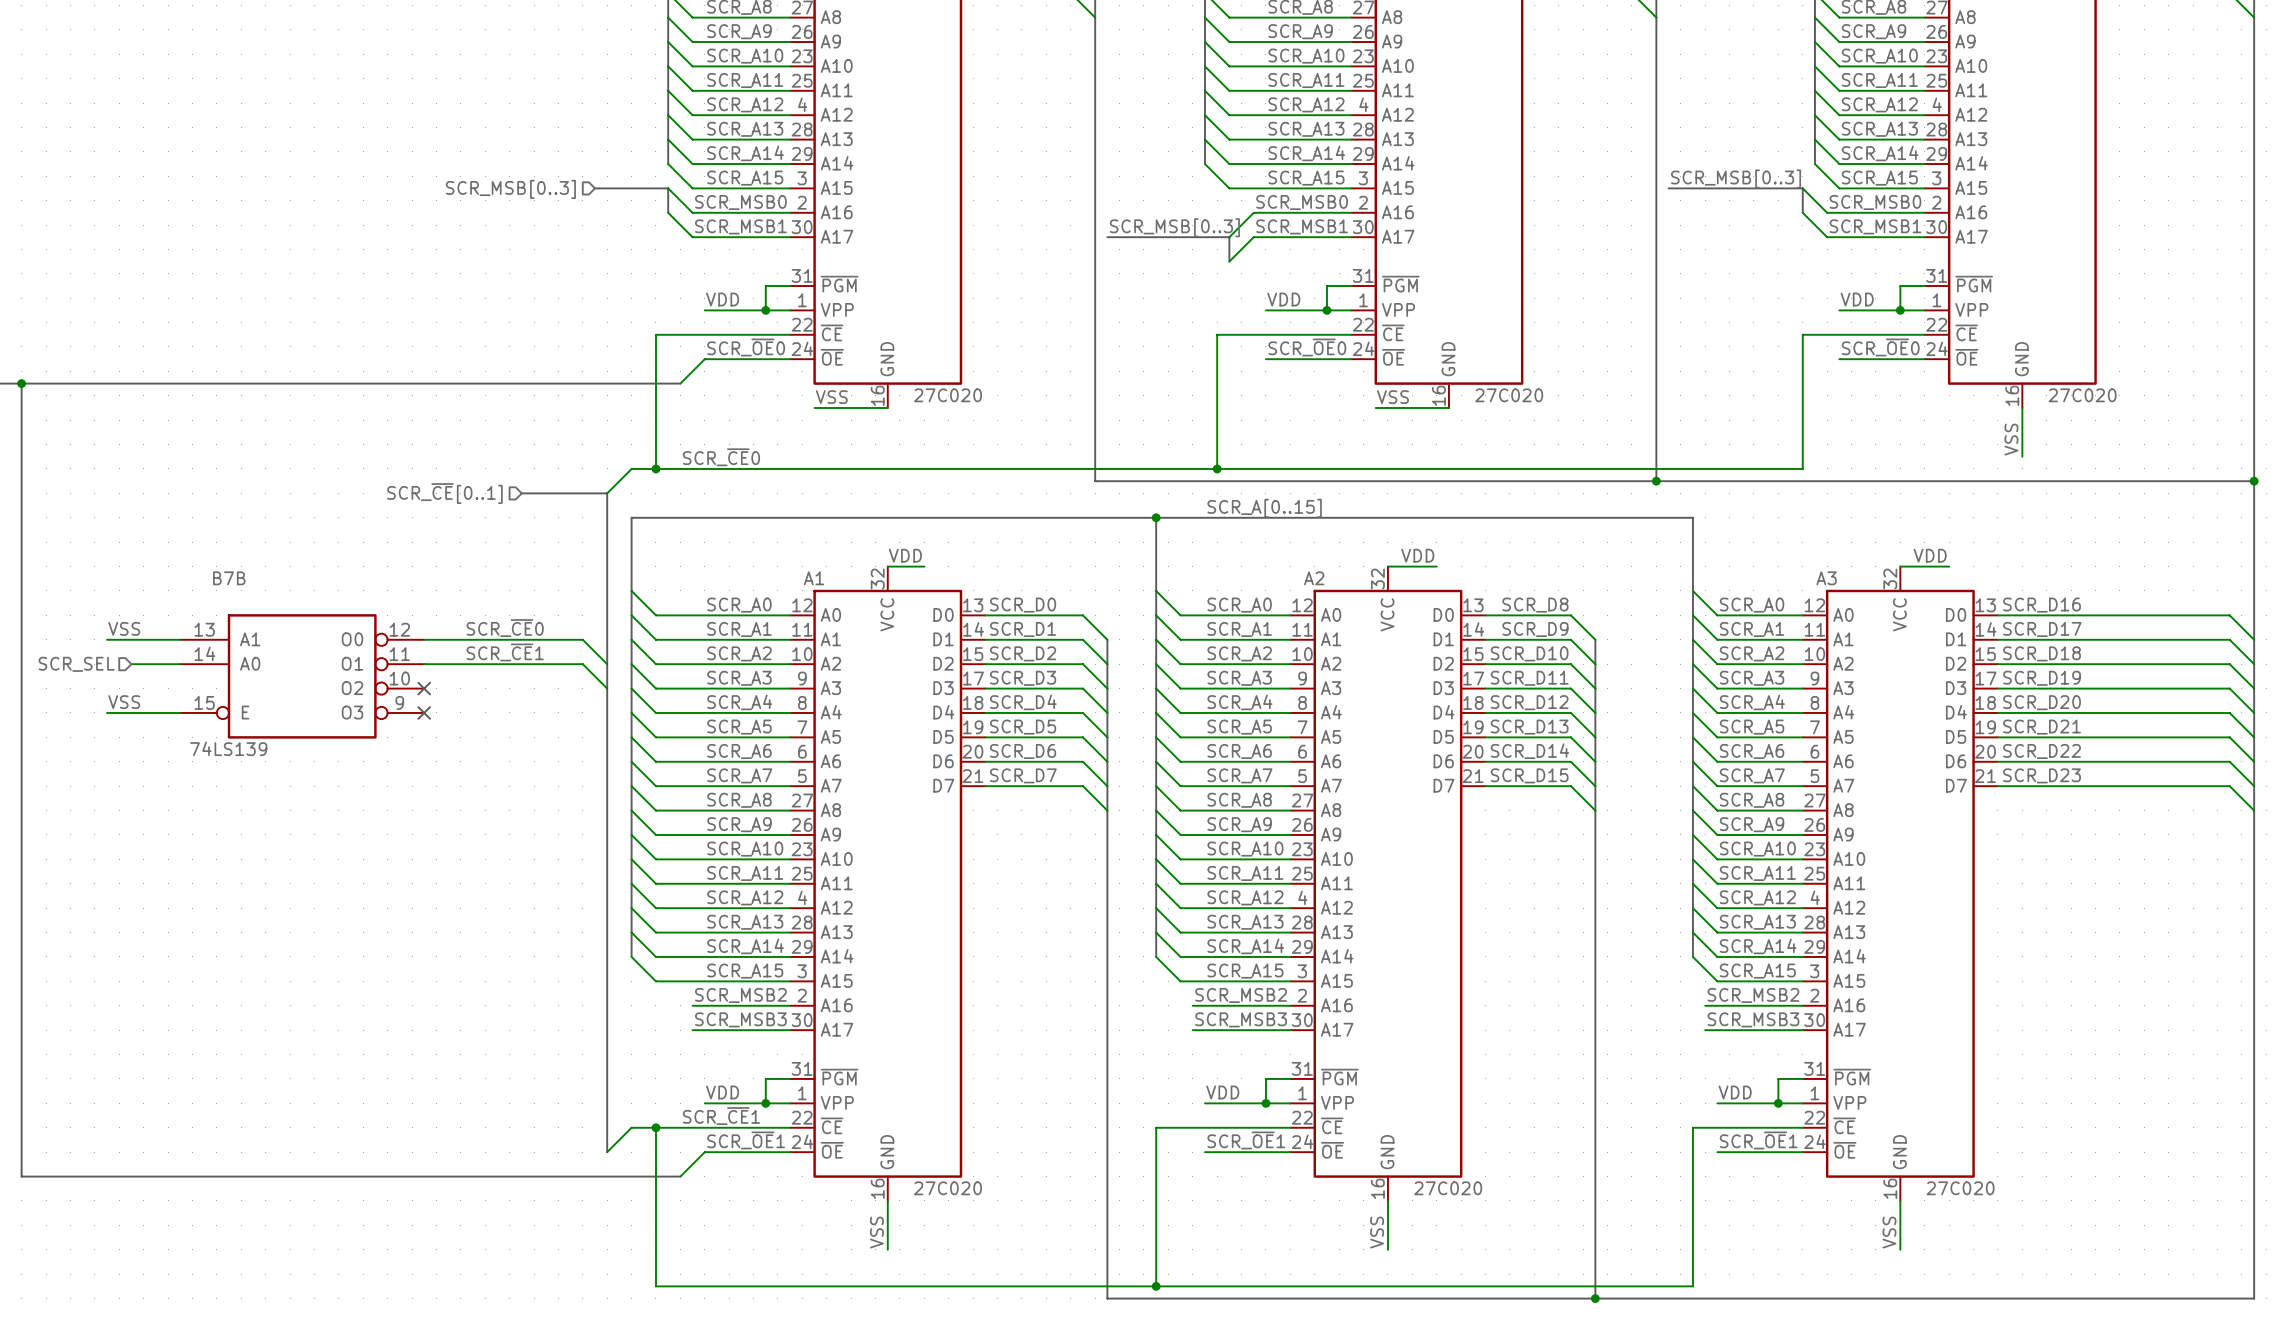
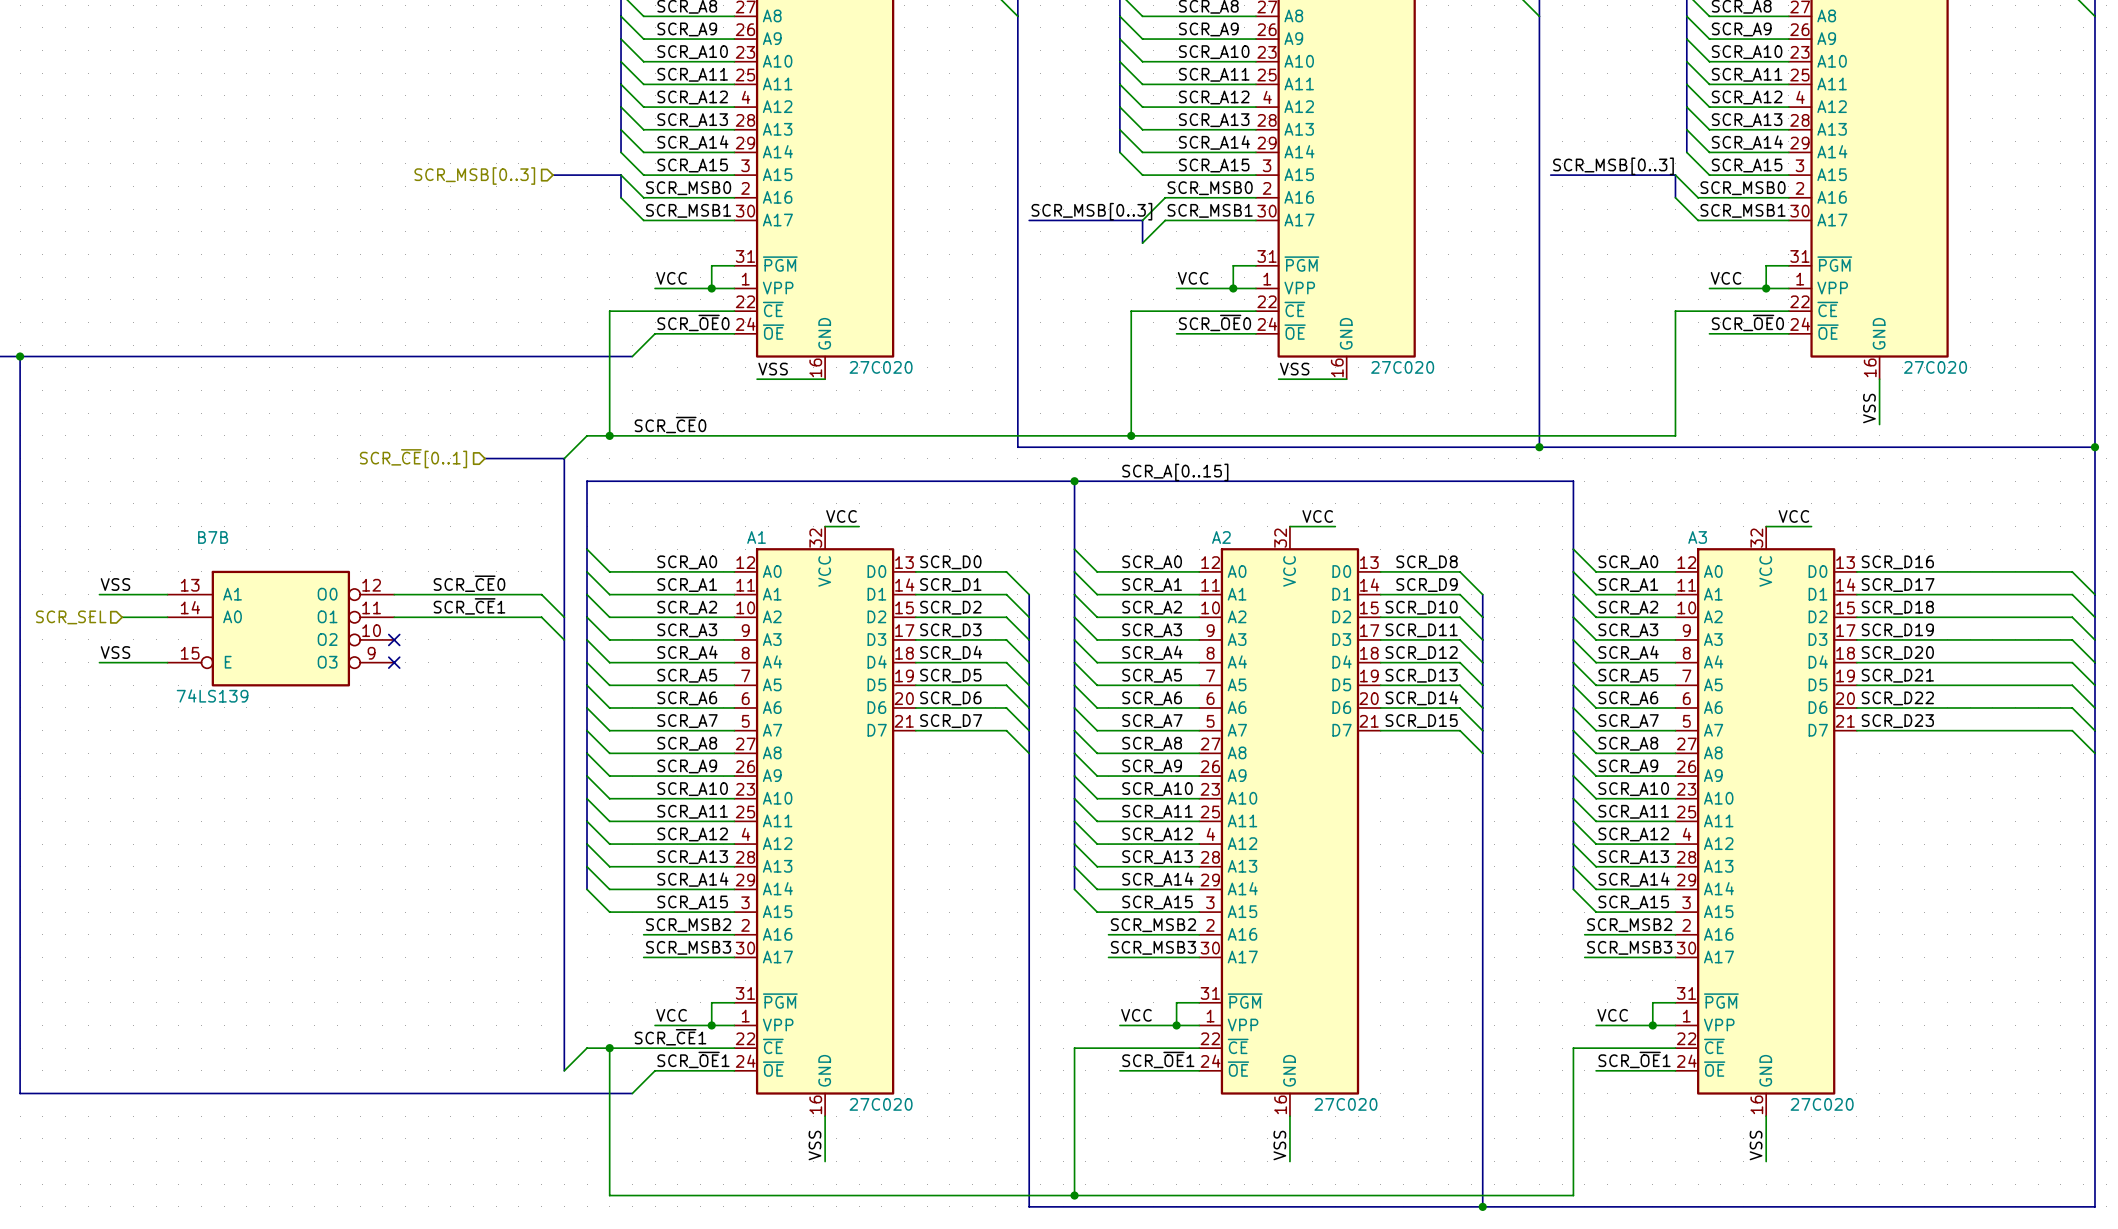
label: VDD (722, 299) -> VCC (671, 278)
label: VDD (1283, 299) -> VCC (1193, 278)
label: VDD (1857, 299) -> VCC (1726, 278)
label: VDD (905, 555) -> VCC (841, 516)
label: VDD (1417, 555) -> VCC (1317, 516)
label: VDD (1930, 555) -> VCC (1793, 516)
label: VDD (722, 1092) -> VCC (671, 1015)
label: VDD (1222, 1092) -> VCC (1136, 1015)
label: VDD (1735, 1092) -> VCC (1612, 1015)

